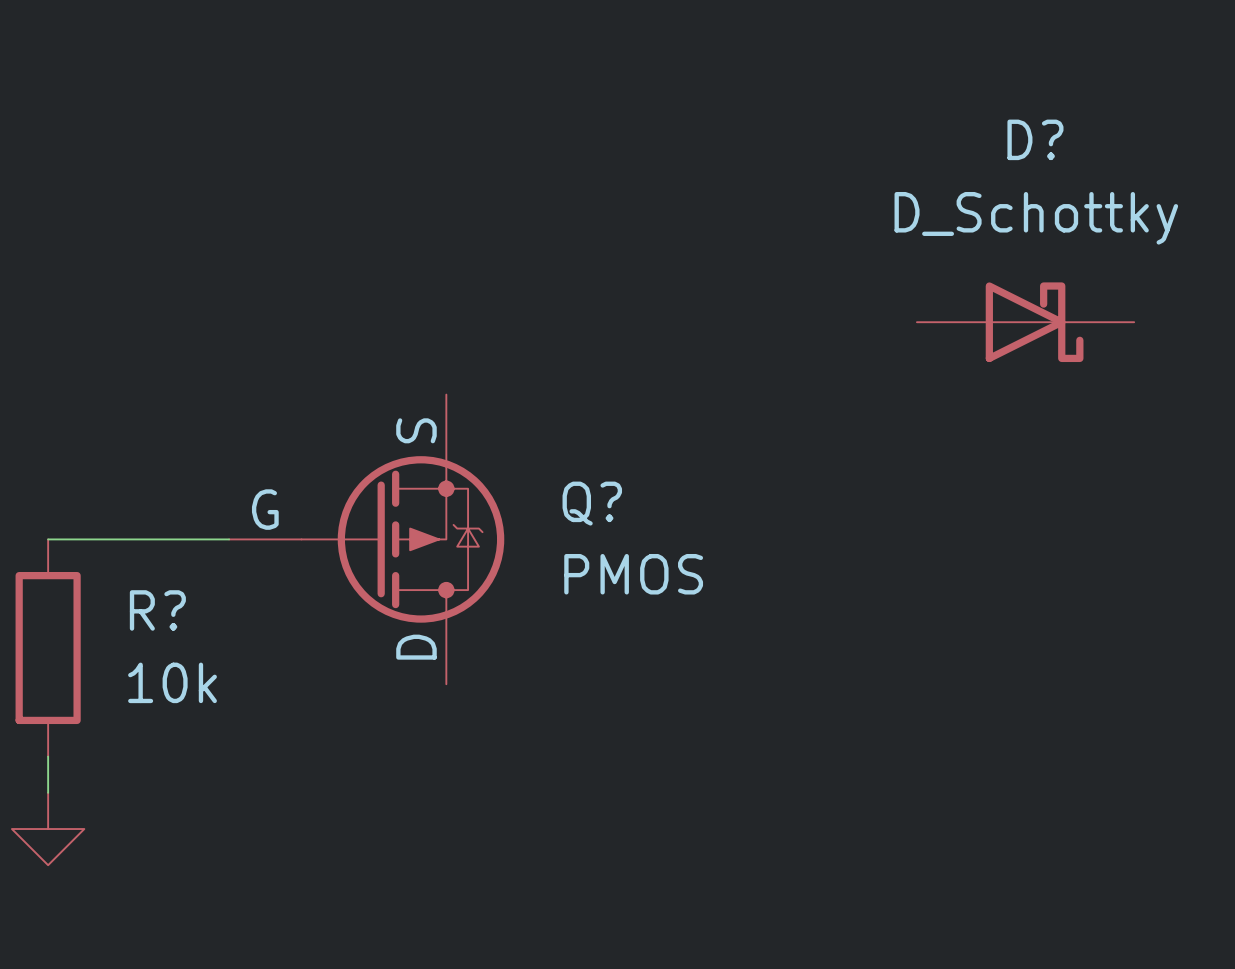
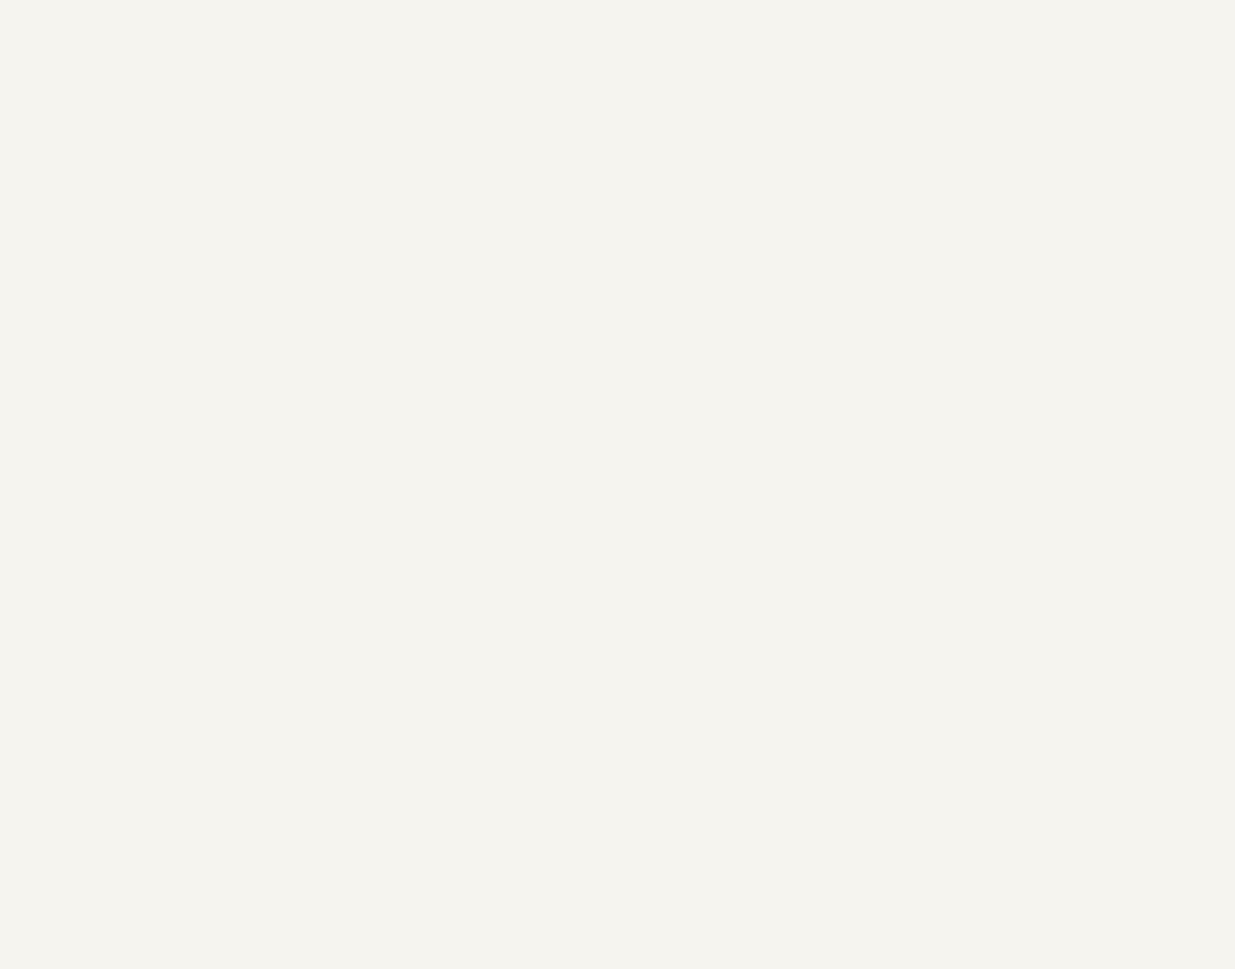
D?: D_Schottky (1025, 322) -> none
wire: (48, 539) (229, 539) -> none
Q?: PMOS (366, 539) -> none
R?: 10k (48, 648) -> none
wire: (48, 756) (48, 792) -> none
power symbol: (48, 829) -> none

